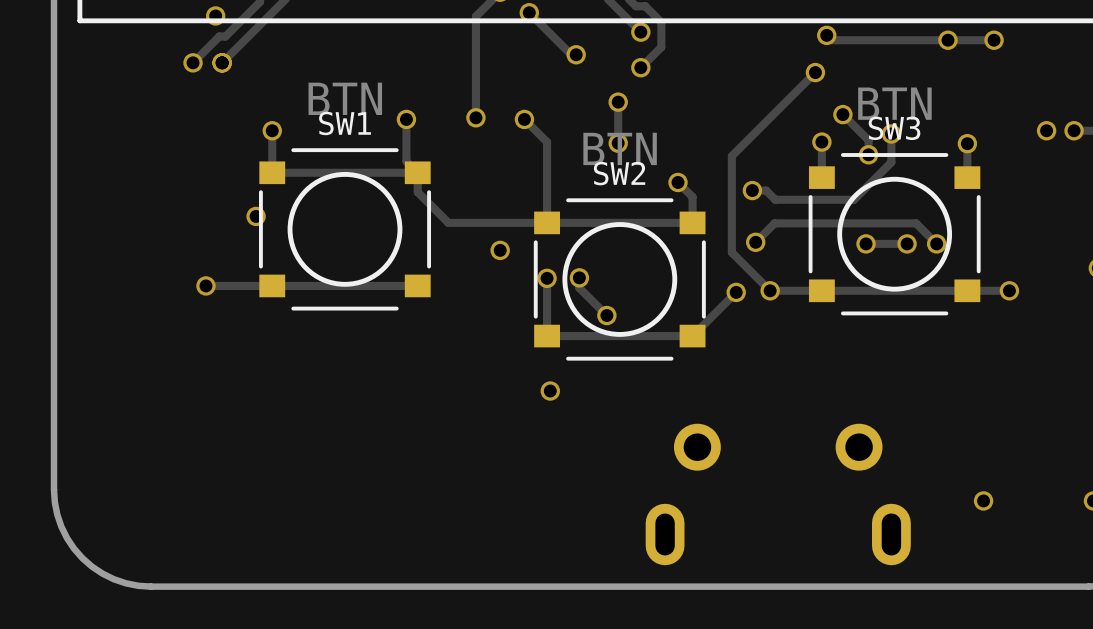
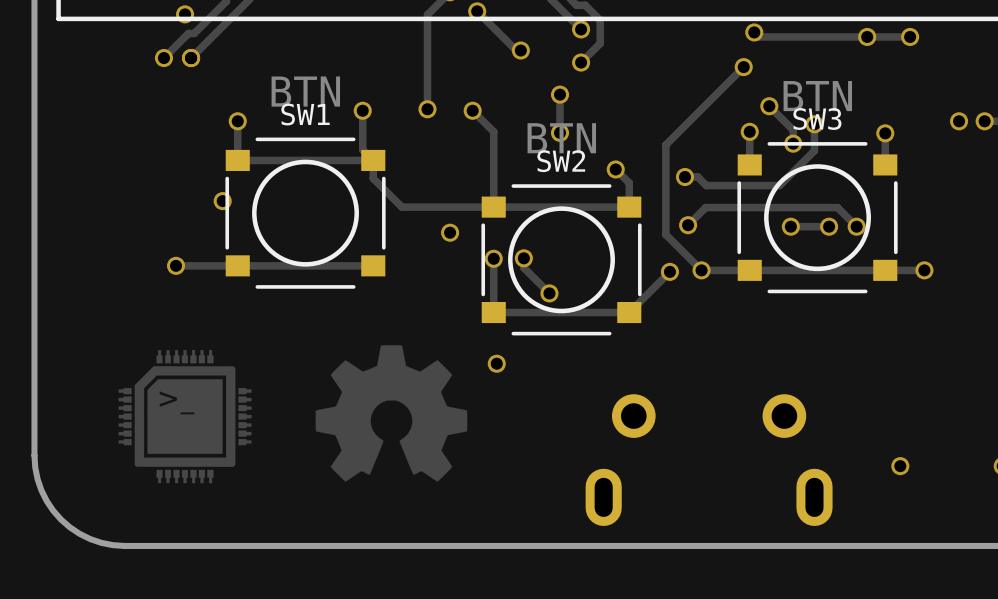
drawing: none -> [315, 345, 468, 482]
drawing: none -> [118, 349, 252, 484]

